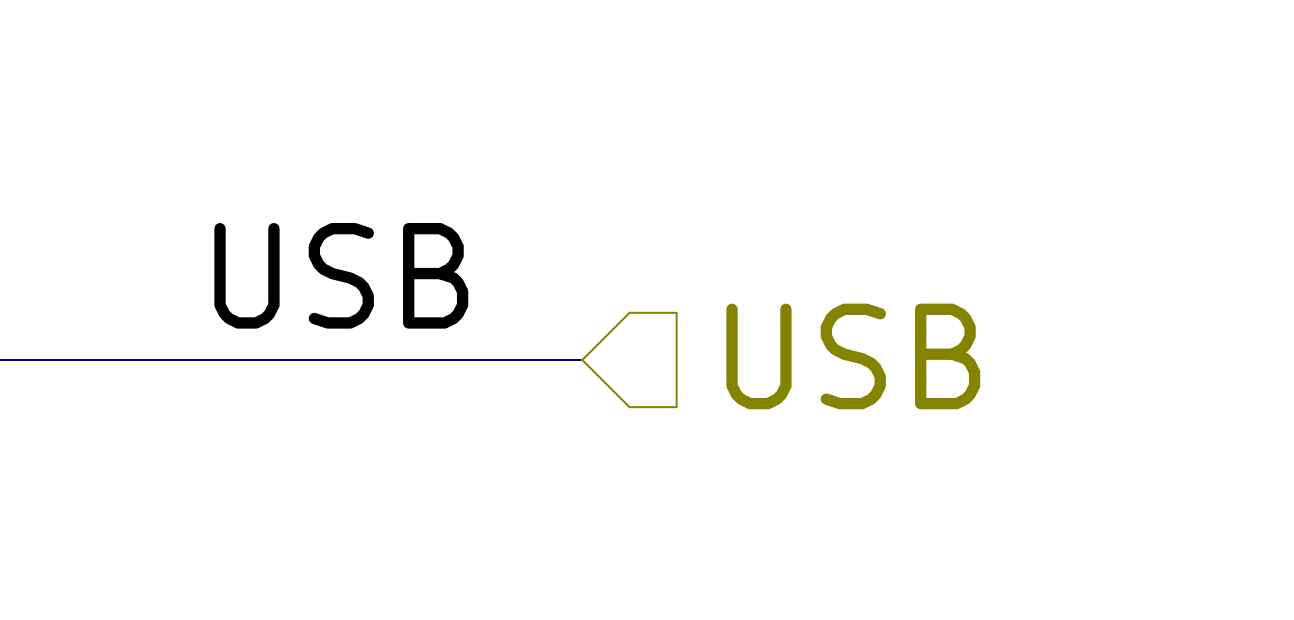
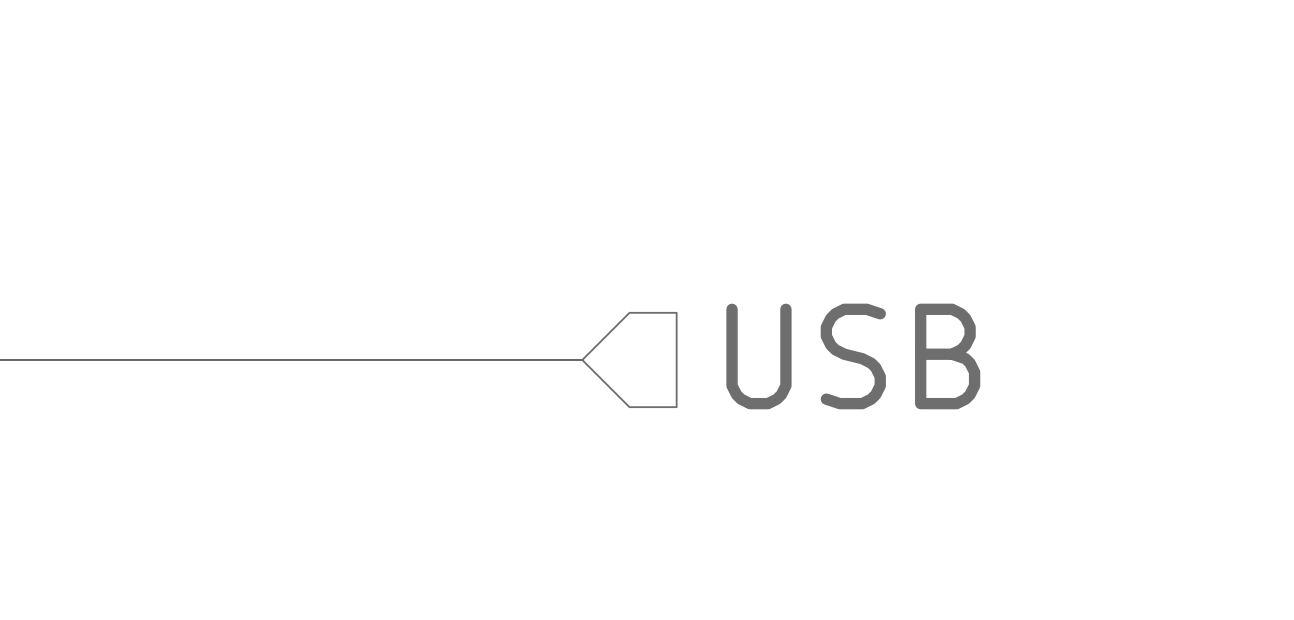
label: USB (341, 275) -> none

